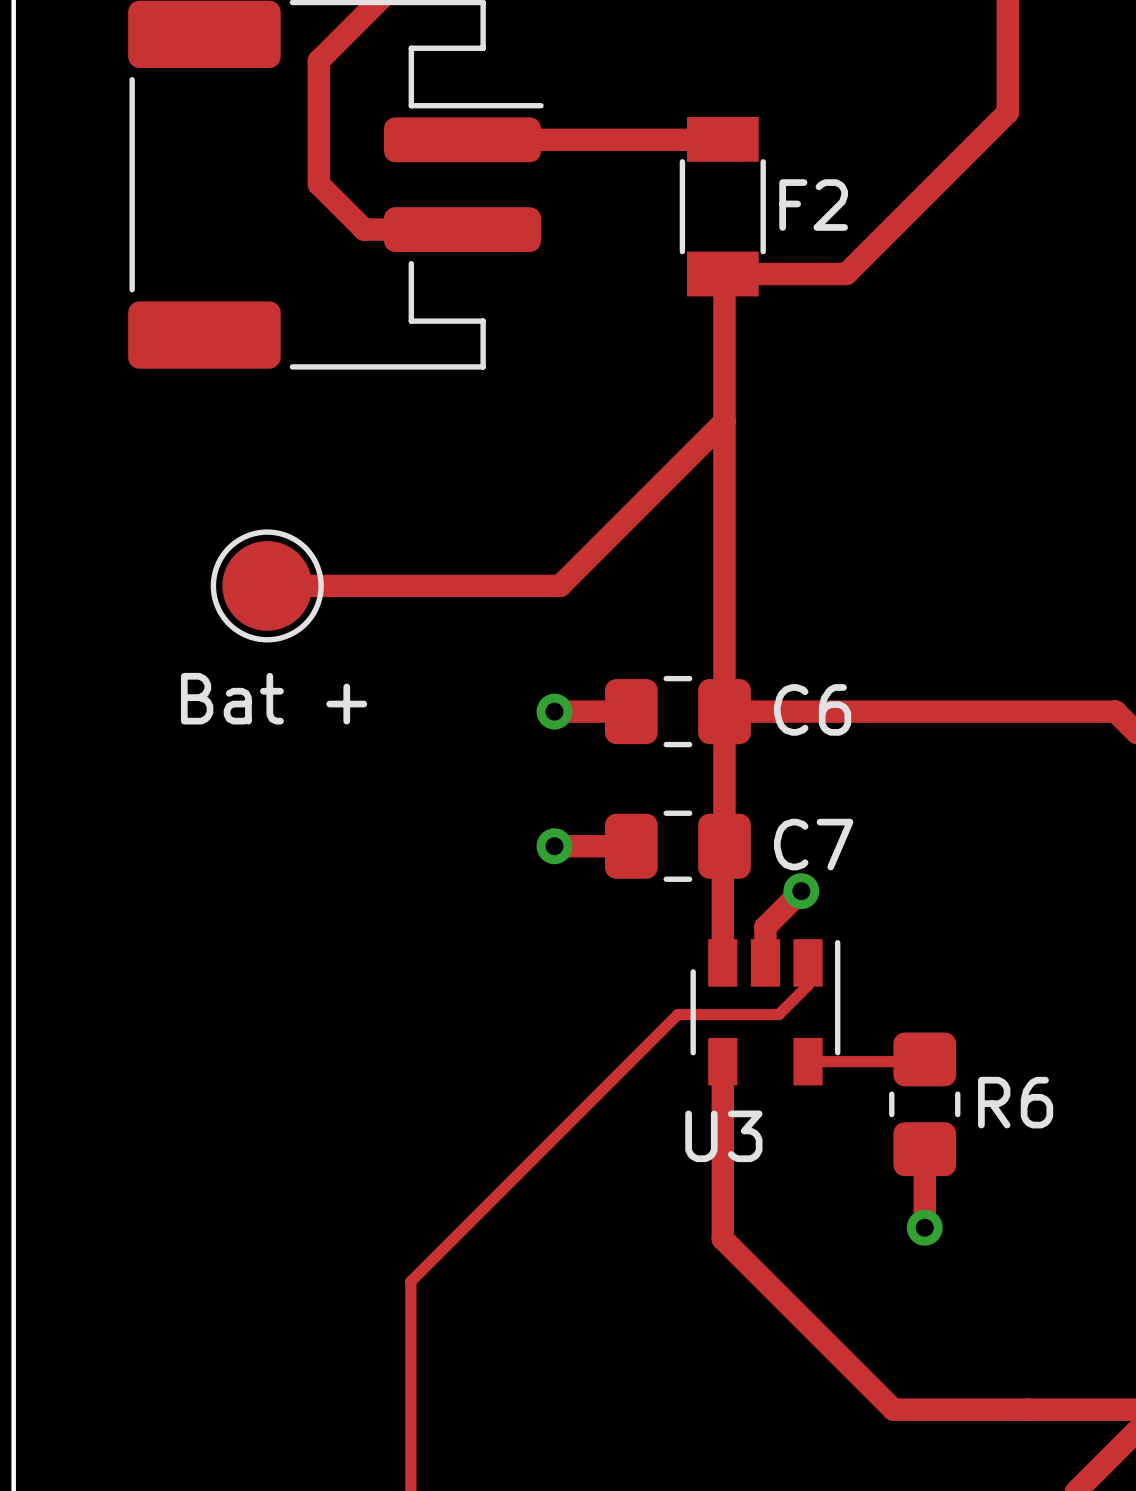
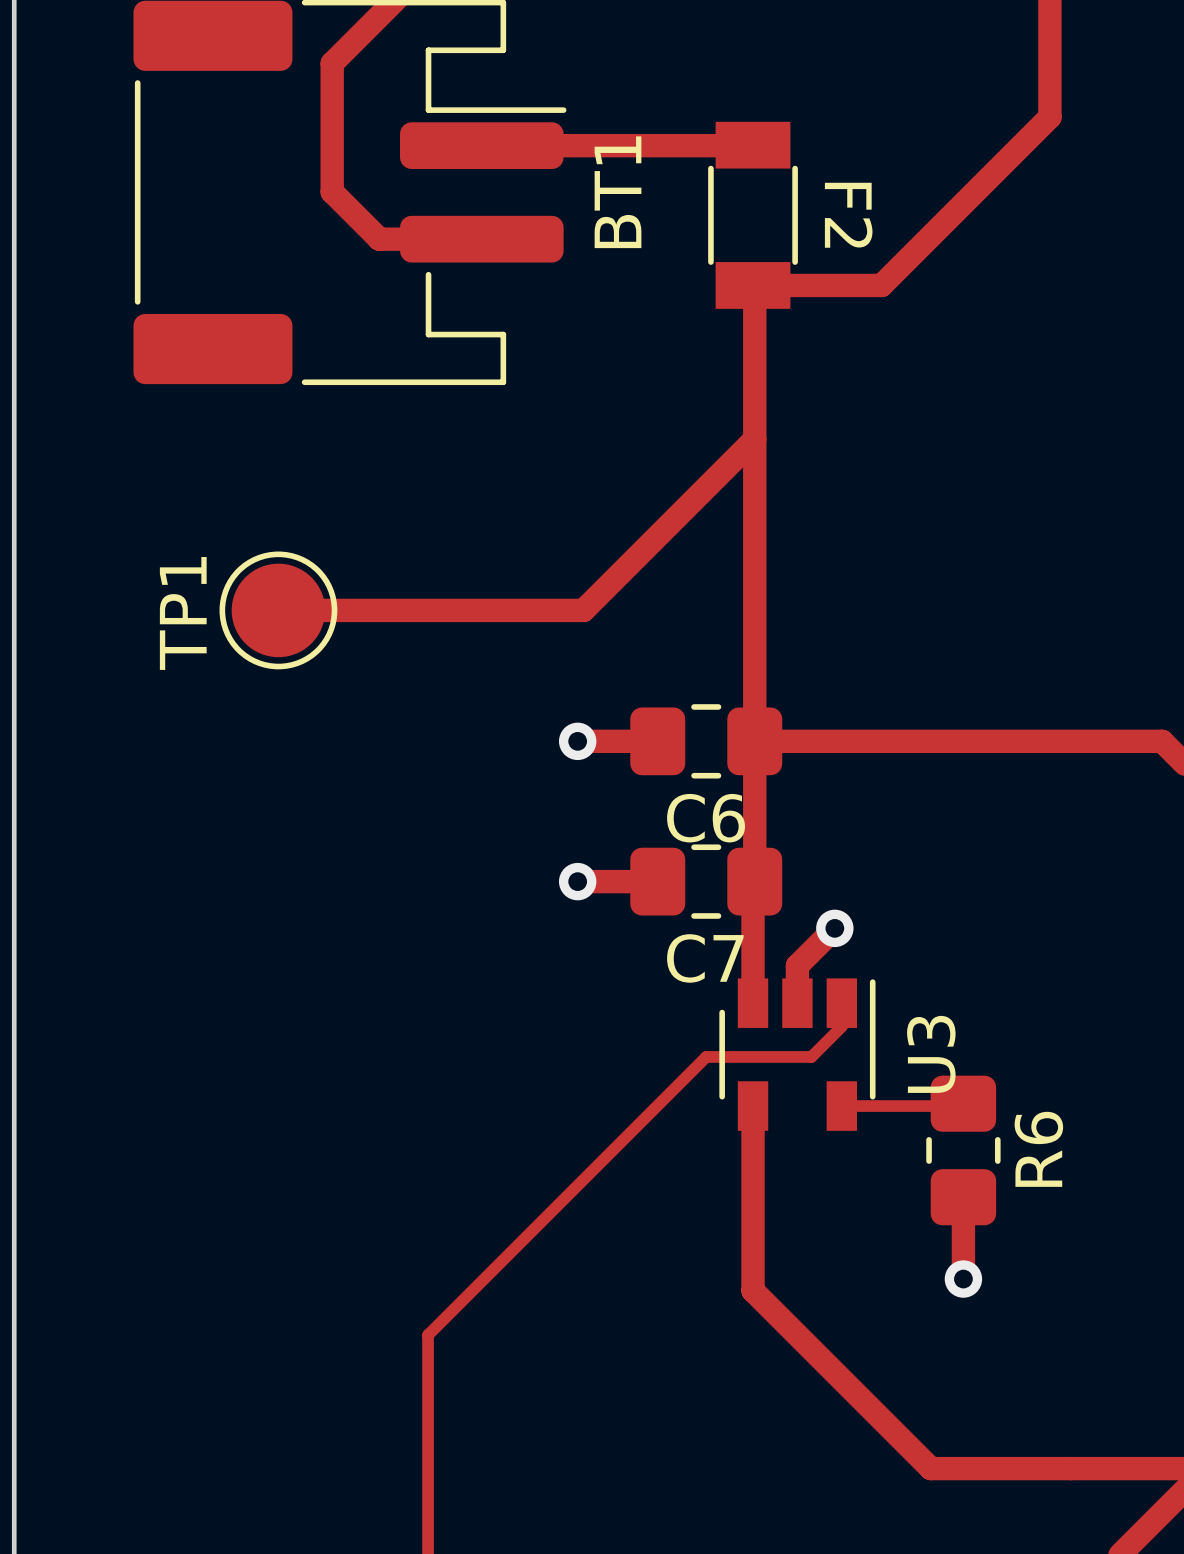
BT1 name: none -> BT1 (618, 192)
F2 name rotation: 0° (813, 205) -> 90° clockwise (848, 215)
Bat + name: Bat + (274, 698) -> TP1 (183, 613)
C6 name position: C6 (812, 709) -> C6 (706, 818)
C7 name position: C7 (813, 844) -> C7 (705, 958)
R6 name rotation: 0° (1015, 1102) -> 90° counterclockwise (1038, 1149)
U3 name rotation: 0° (723, 1136) -> 90° counterclockwise (931, 1054)
U3 name position: U3 (723, 1136) -> U3 (931, 1054)

